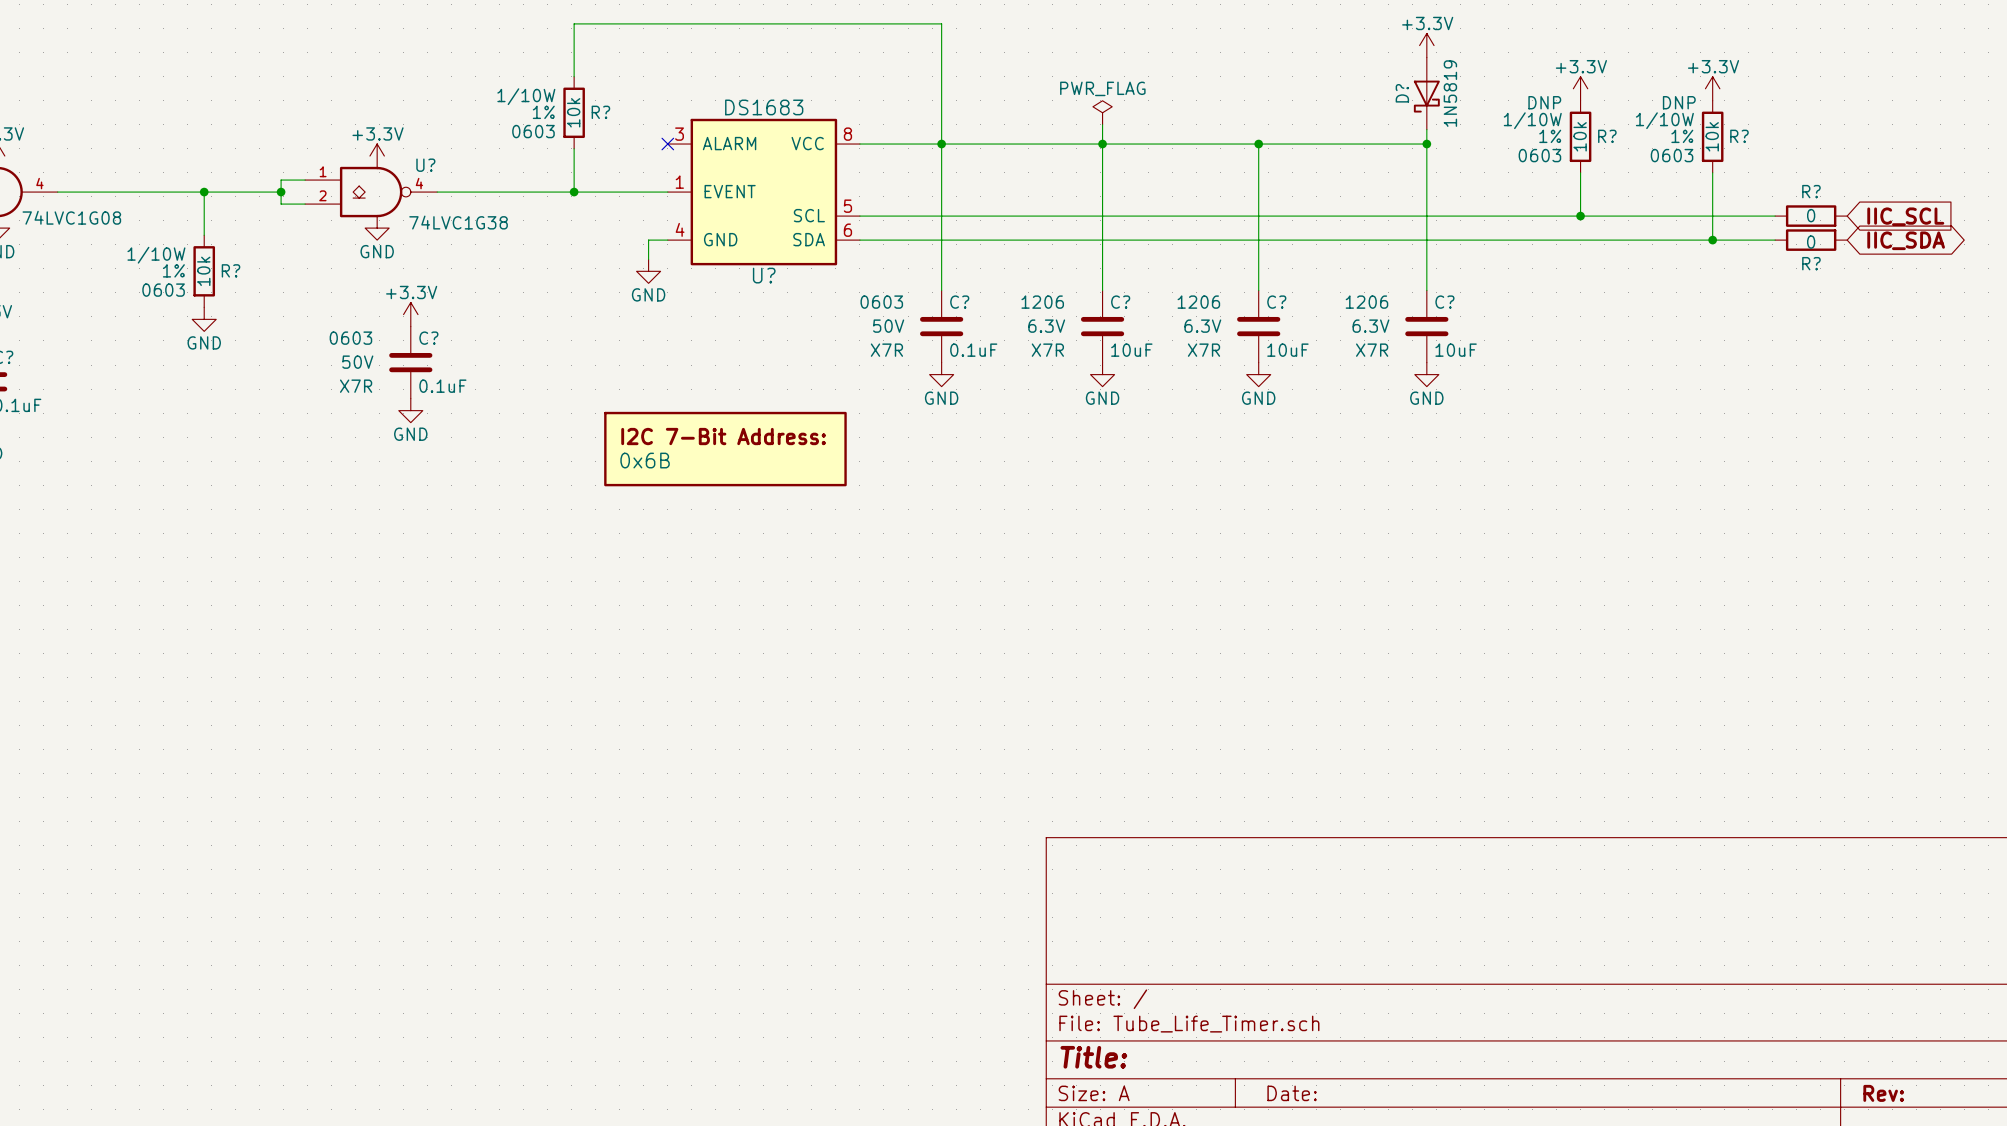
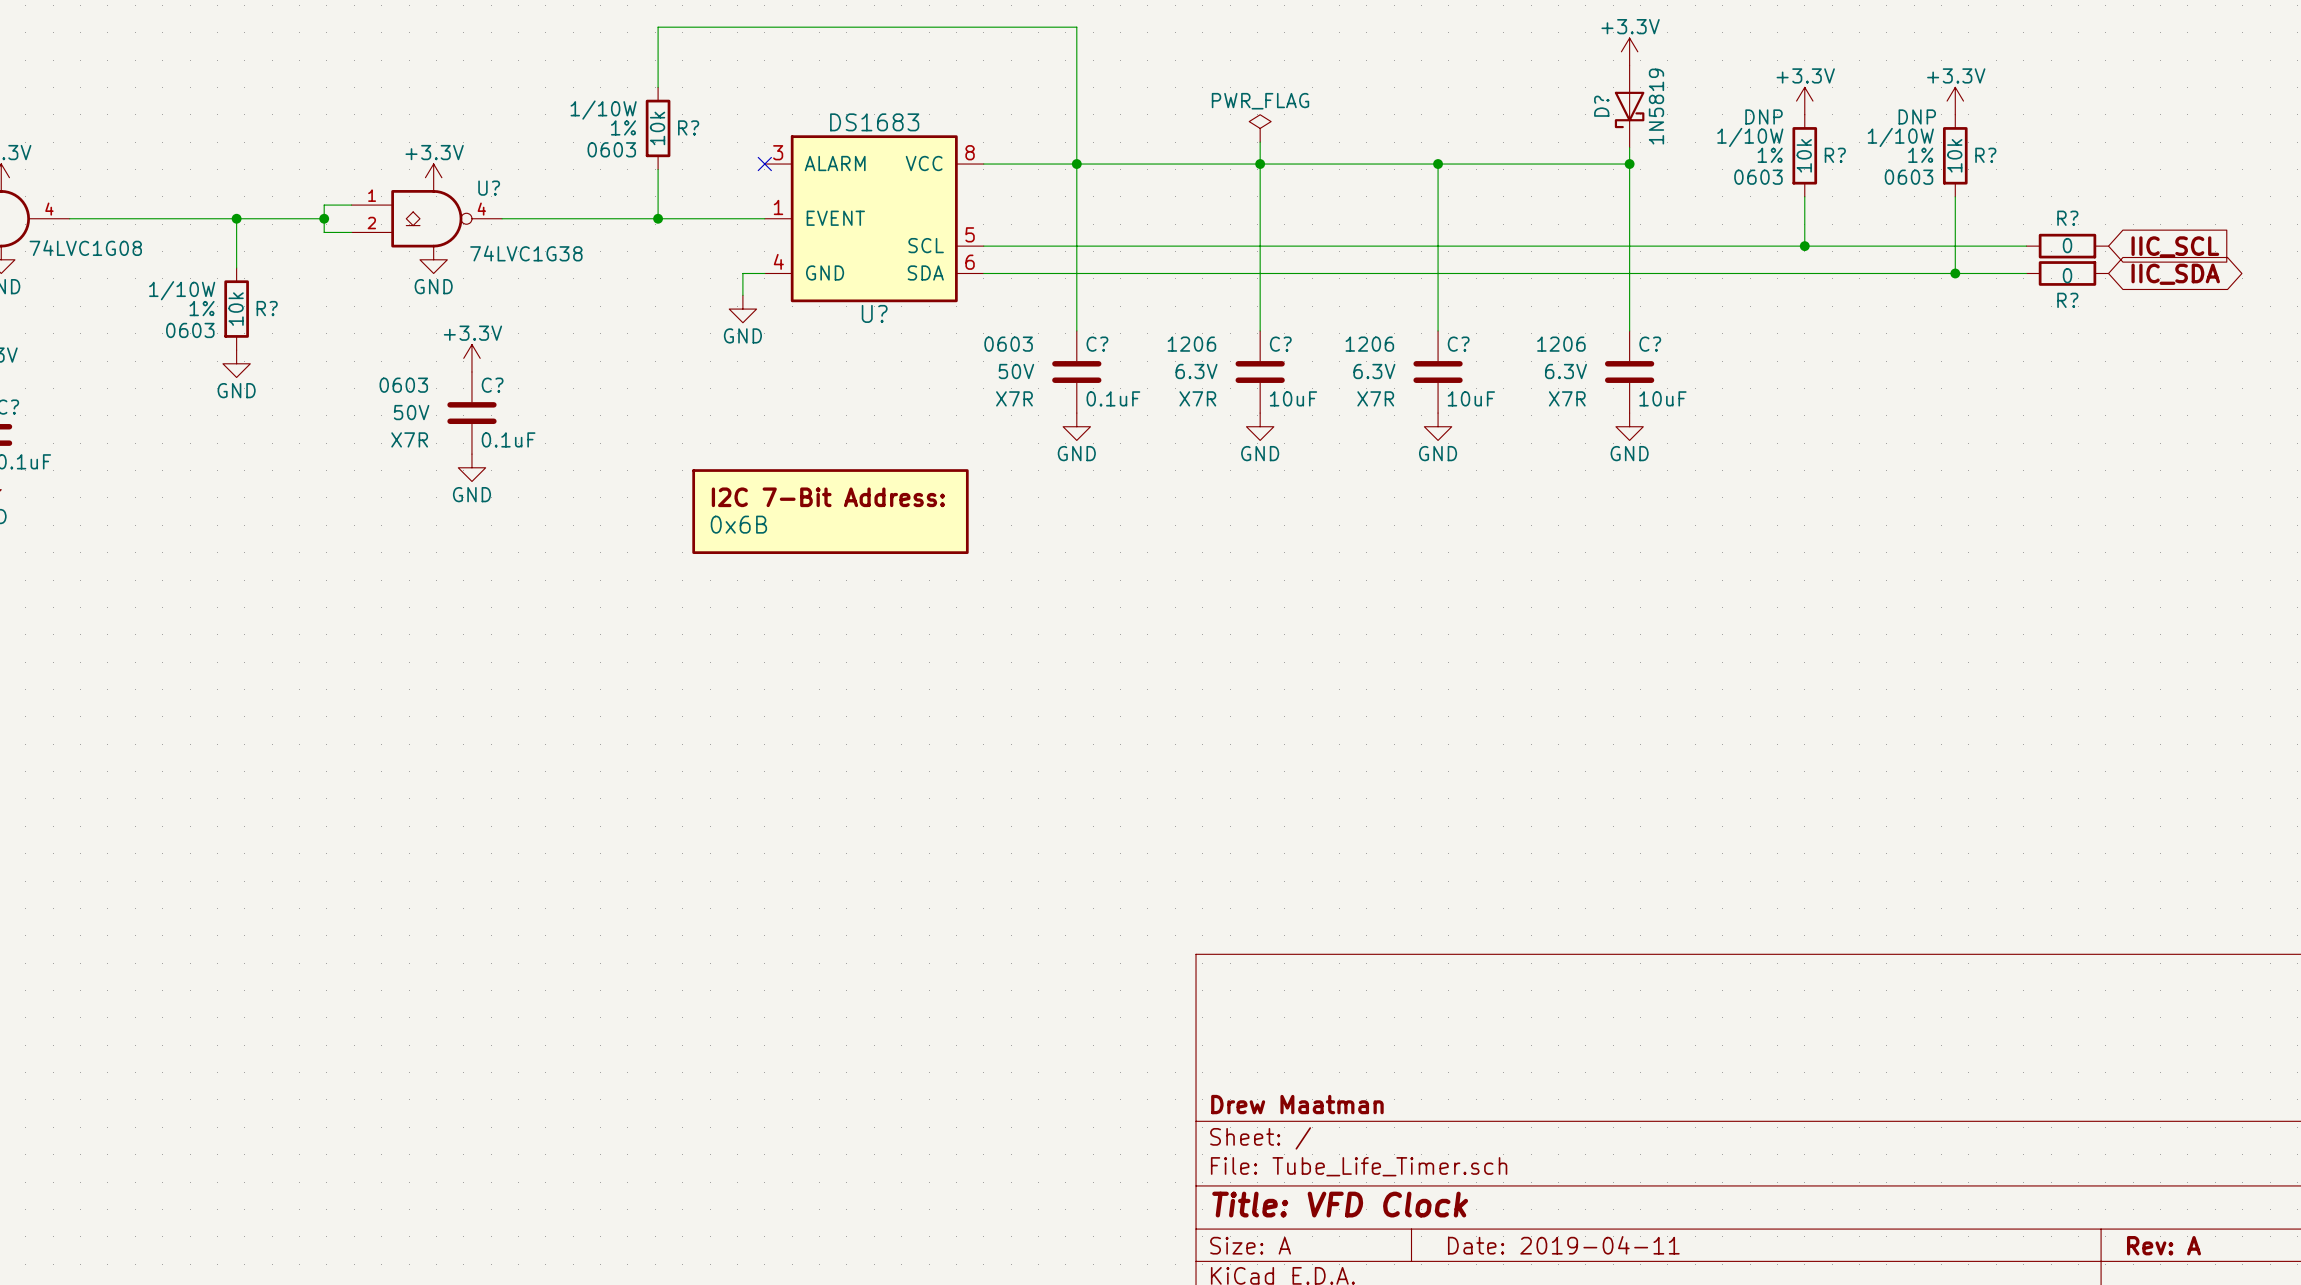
title block: none -> Drew Maatman (1297, 1104)
title block: Title: (1093, 1057) -> Title: VFD Clock (1340, 1204)
title block: Date: (1292, 1093) -> Date: 2019-04-11 (1563, 1245)
title block: Rev: (1883, 1093) -> Rev: A (2164, 1245)

